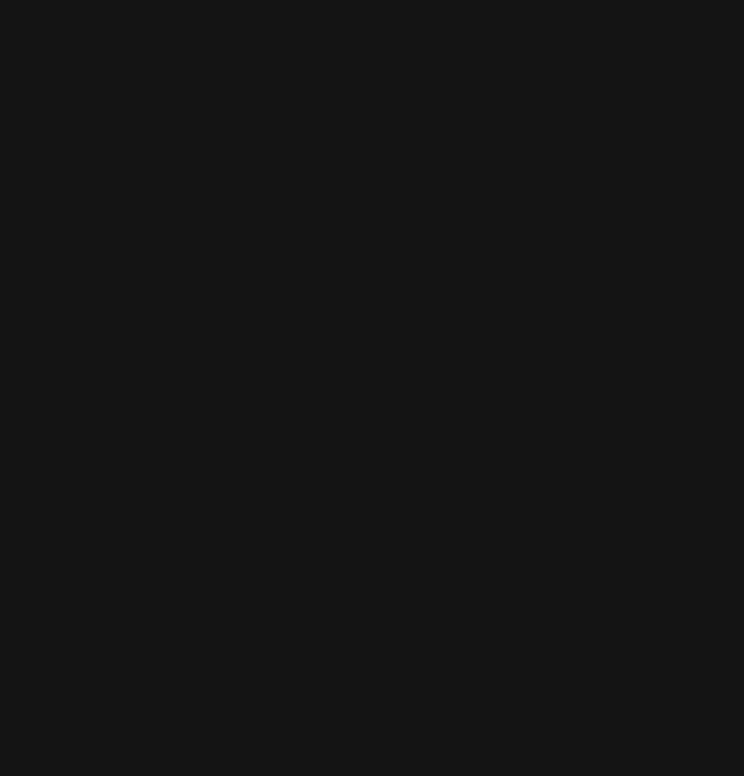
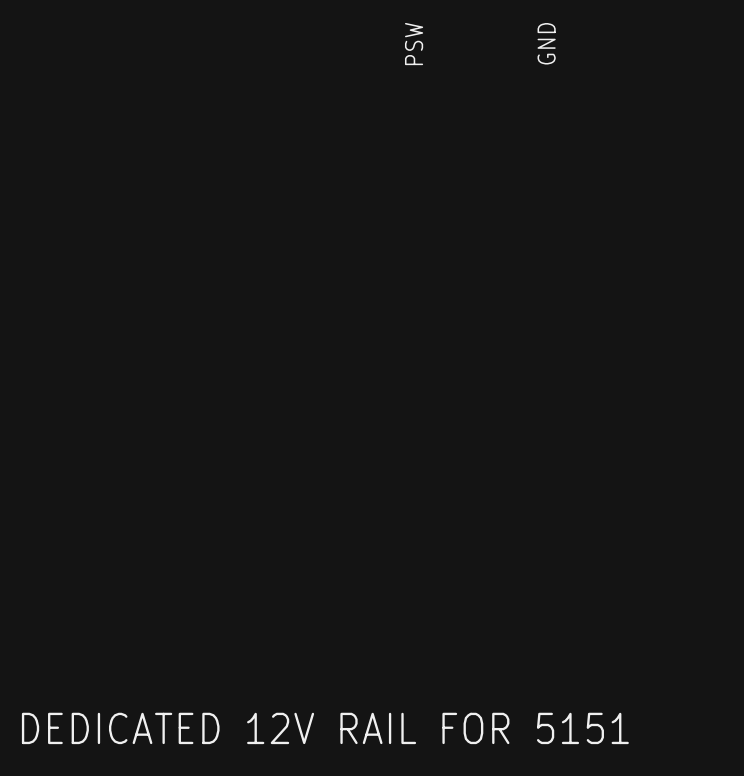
text: none -> GND (546, 43)
text: none -> PSW (414, 44)
text: none -> DEDICATED 12V RAIL FOR 5151 (325, 728)

